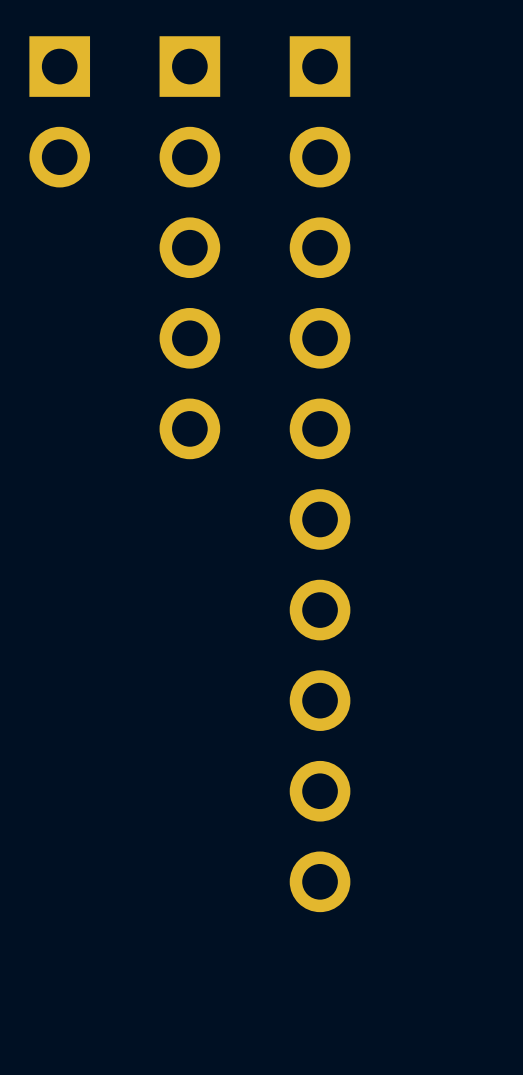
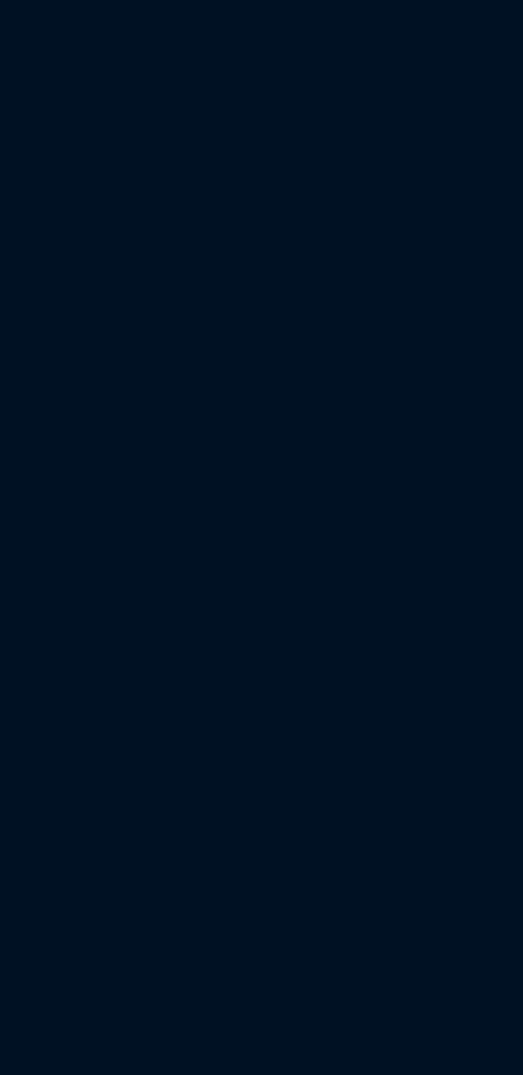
part: (59, 111) -> none
part: (189, 247) -> none
part: (320, 474) -> none

